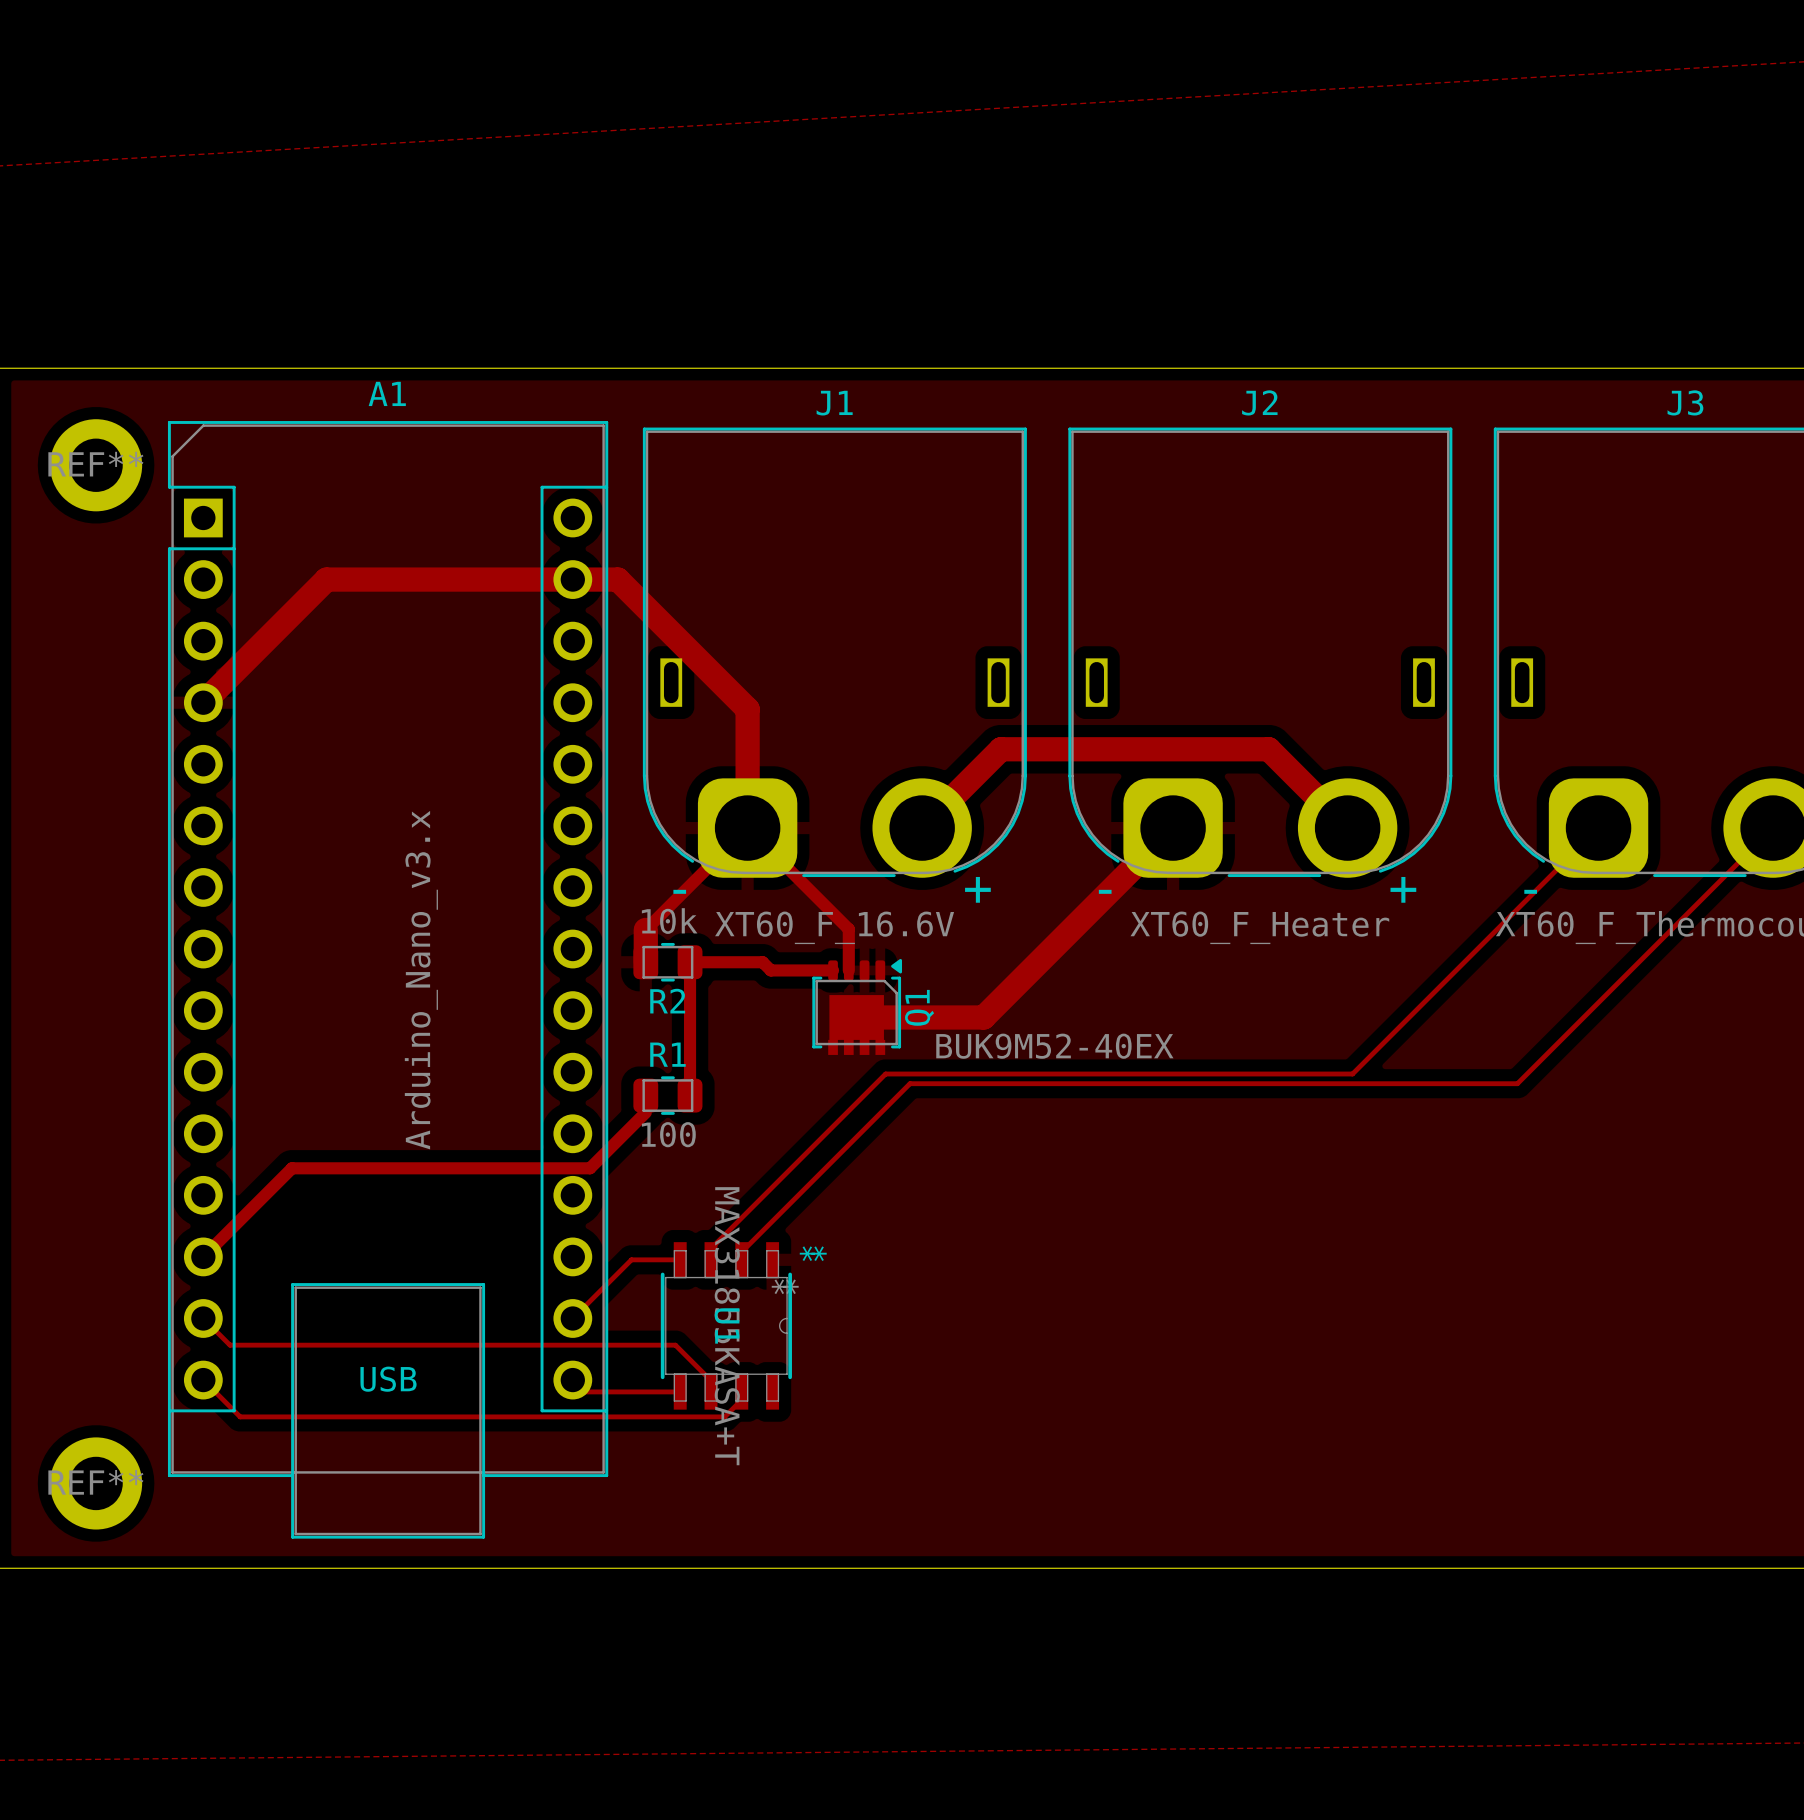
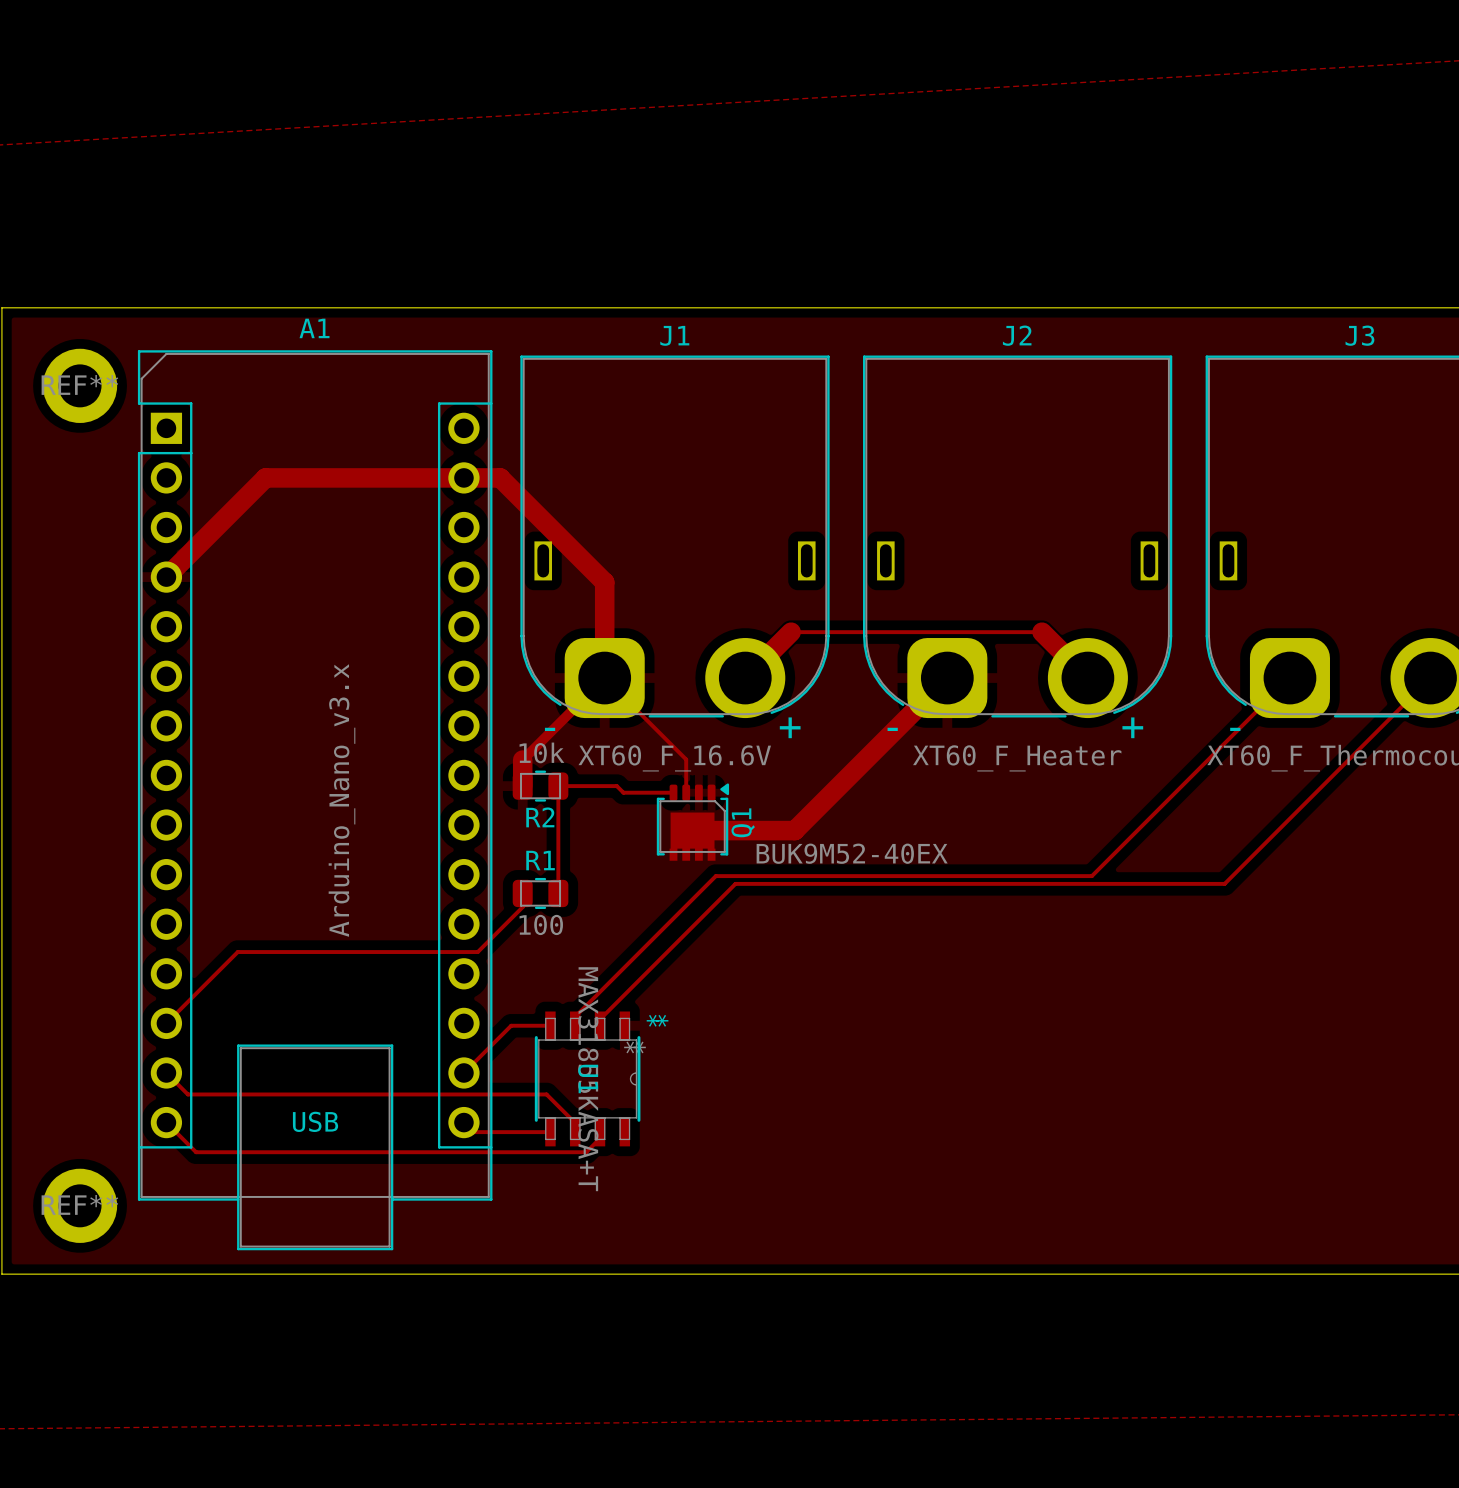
track: (979, 771) (1000, 749) (1268, 749) (1290, 771) -> (791, 632) (1042, 632)
track width: thick (747, 828) (848, 929) (848, 970) -> thin (604, 678) (686, 759) (686, 792)
track width: thick (833, 970) (770, 970) (762, 962) (690, 962) (690, 1095) -> thin (673, 792) (623, 792) (616, 786) (558, 786) (558, 893)
track width: thick (645, 1112) (590, 1168) (291, 1168) (203, 1256) -> thin (522, 907) (477, 952) (237, 952) (166, 1023)

